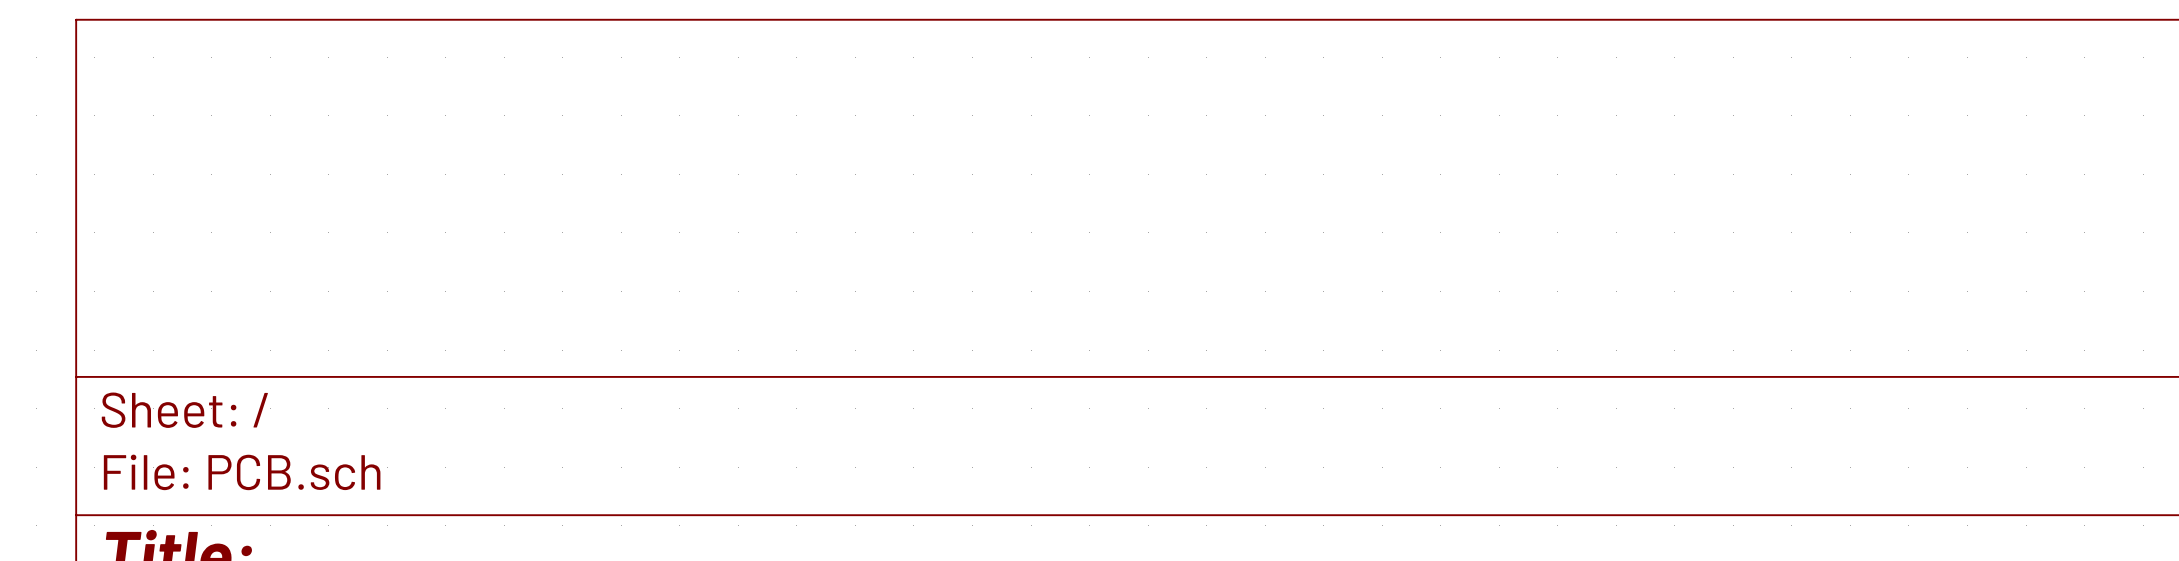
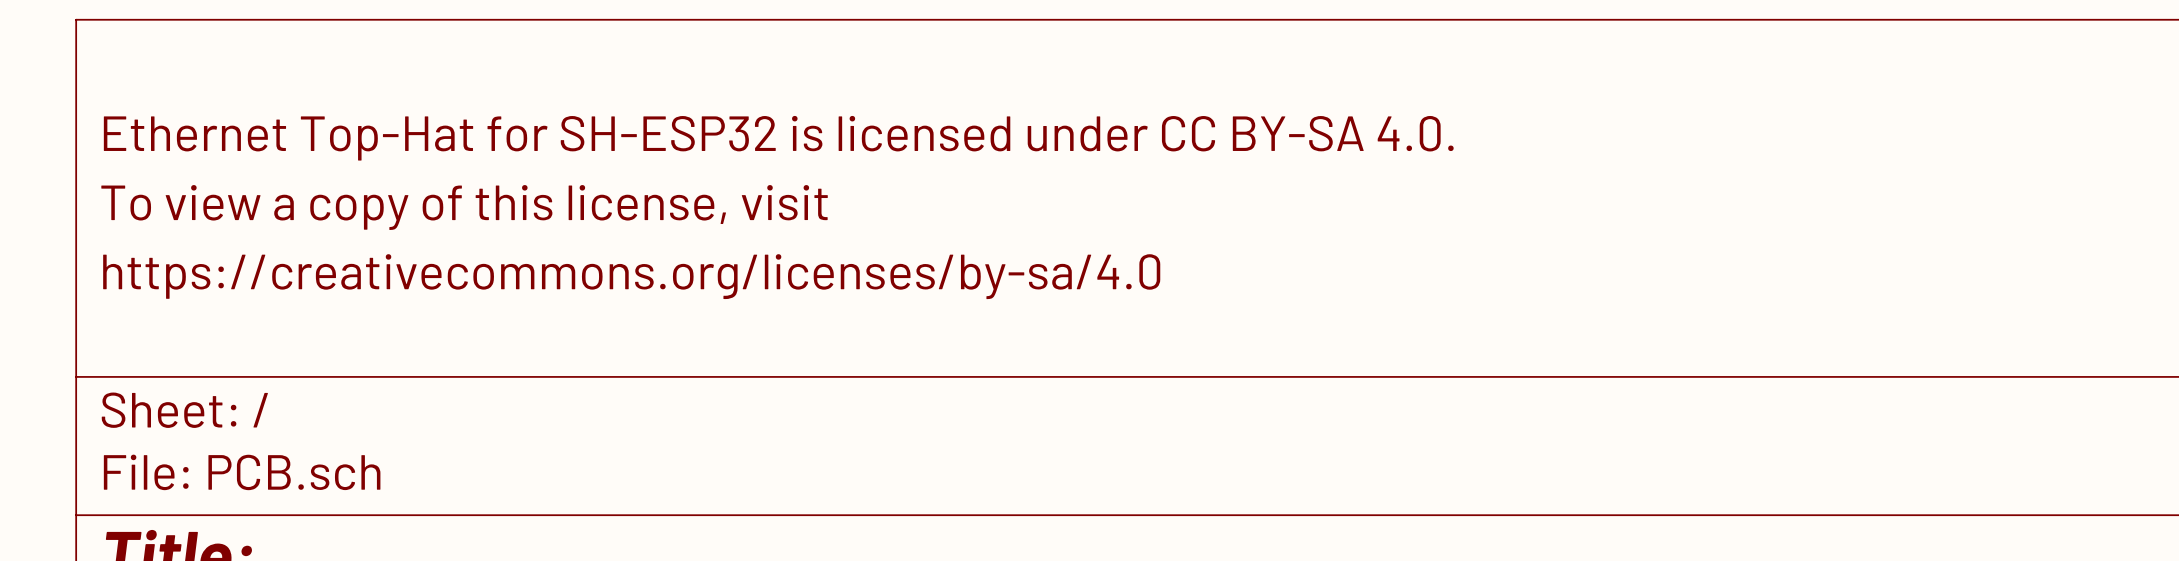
title block: none -> Ethernet Top-Hat for SH-ESP32 is licensed under CC BY-SA 4.0. (778, 138)
title block: none -> To view a copy of this license, visit (464, 207)
title block: none -> https://creativecommons.org/licenses/by-sa/4.0 (631, 276)

